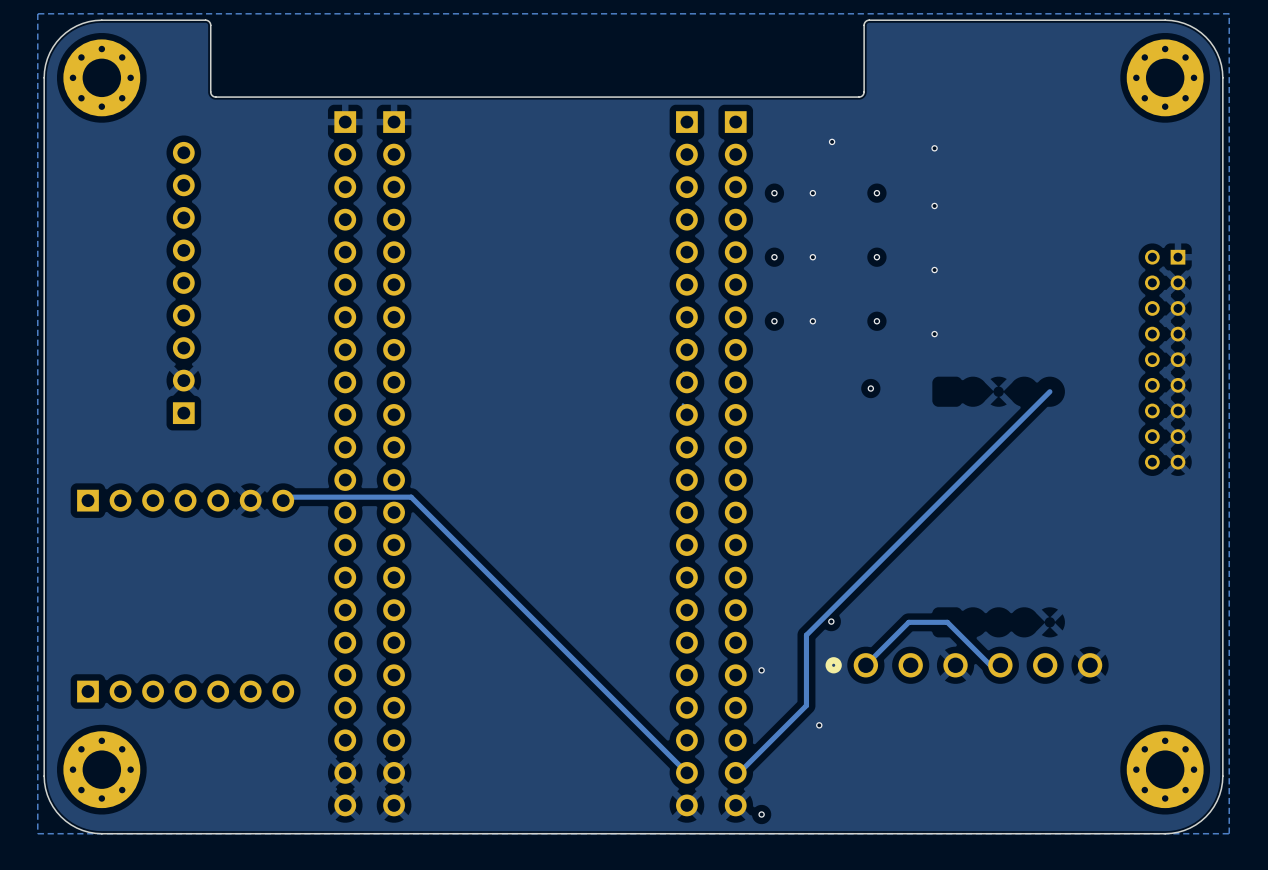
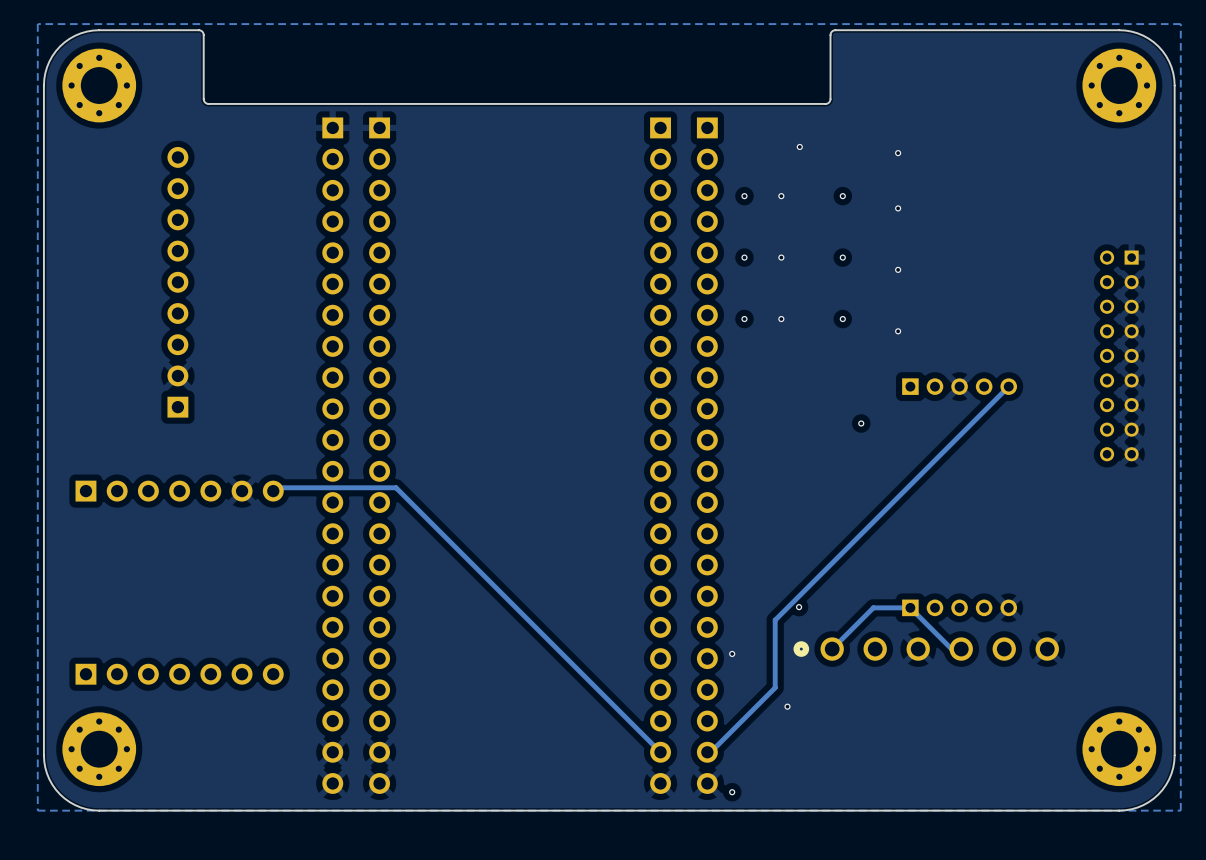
via position: (870, 388) -> (861, 423)
part: none -> (959, 386)
part: none -> (959, 607)

